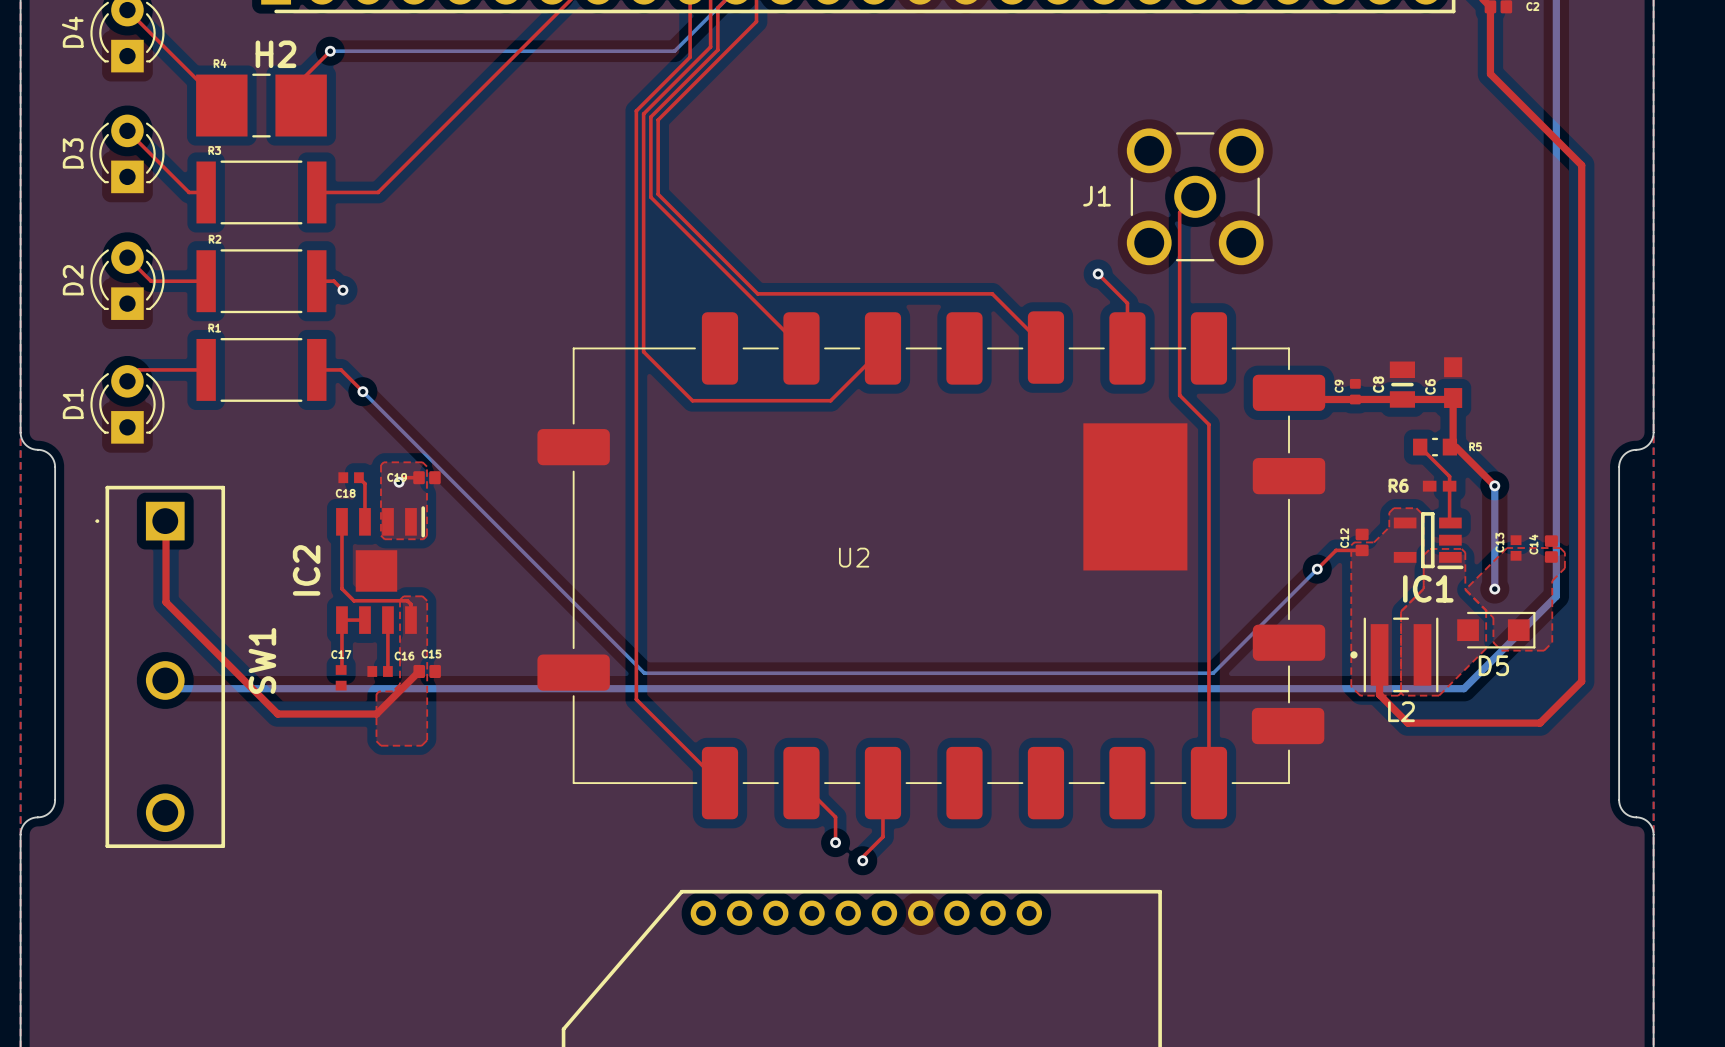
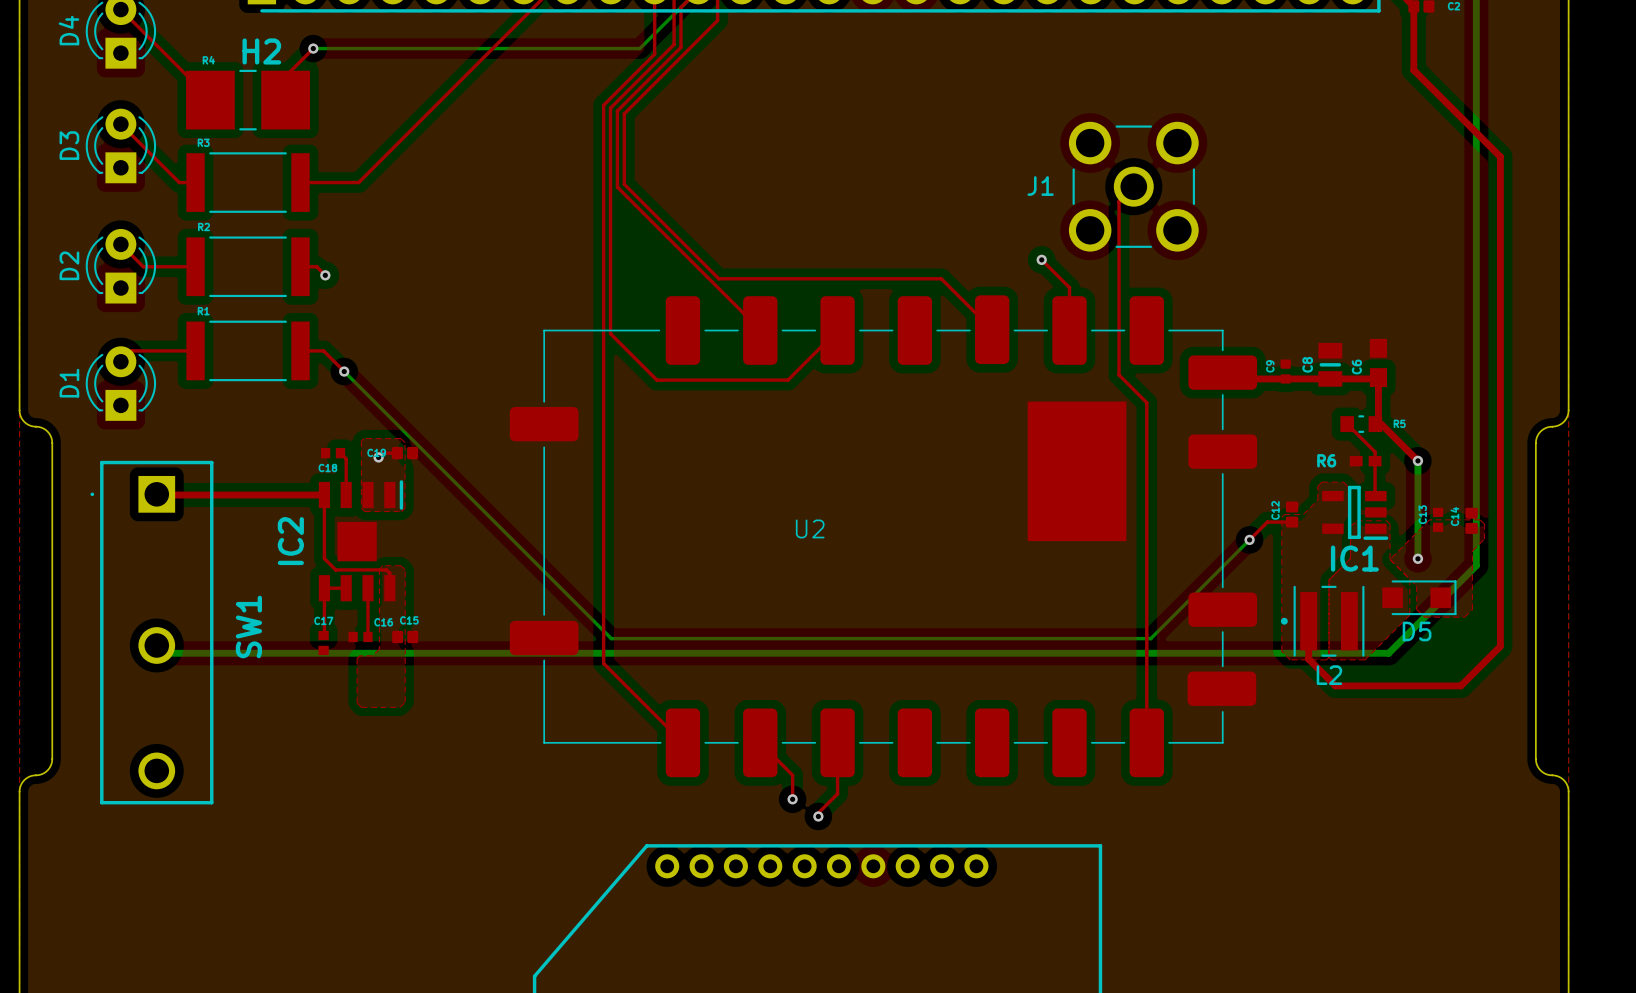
top track: (166, 521) (166, 602) (277, 714) (376, 714) (419, 671) -> (157, 495) (324, 495)

